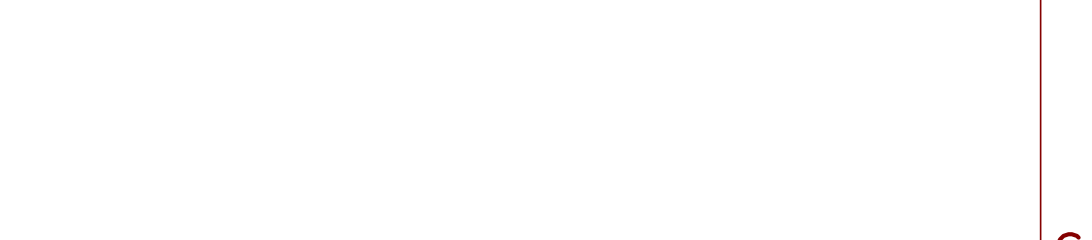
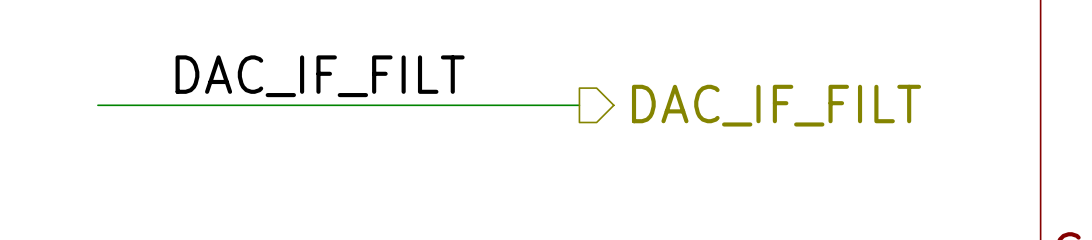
label: none -> DAC_IF_FILT (320, 76)
wire: none -> (97, 105) (579, 105)
hierarchical label: none -> DAC_IF_FILT (776, 105)

